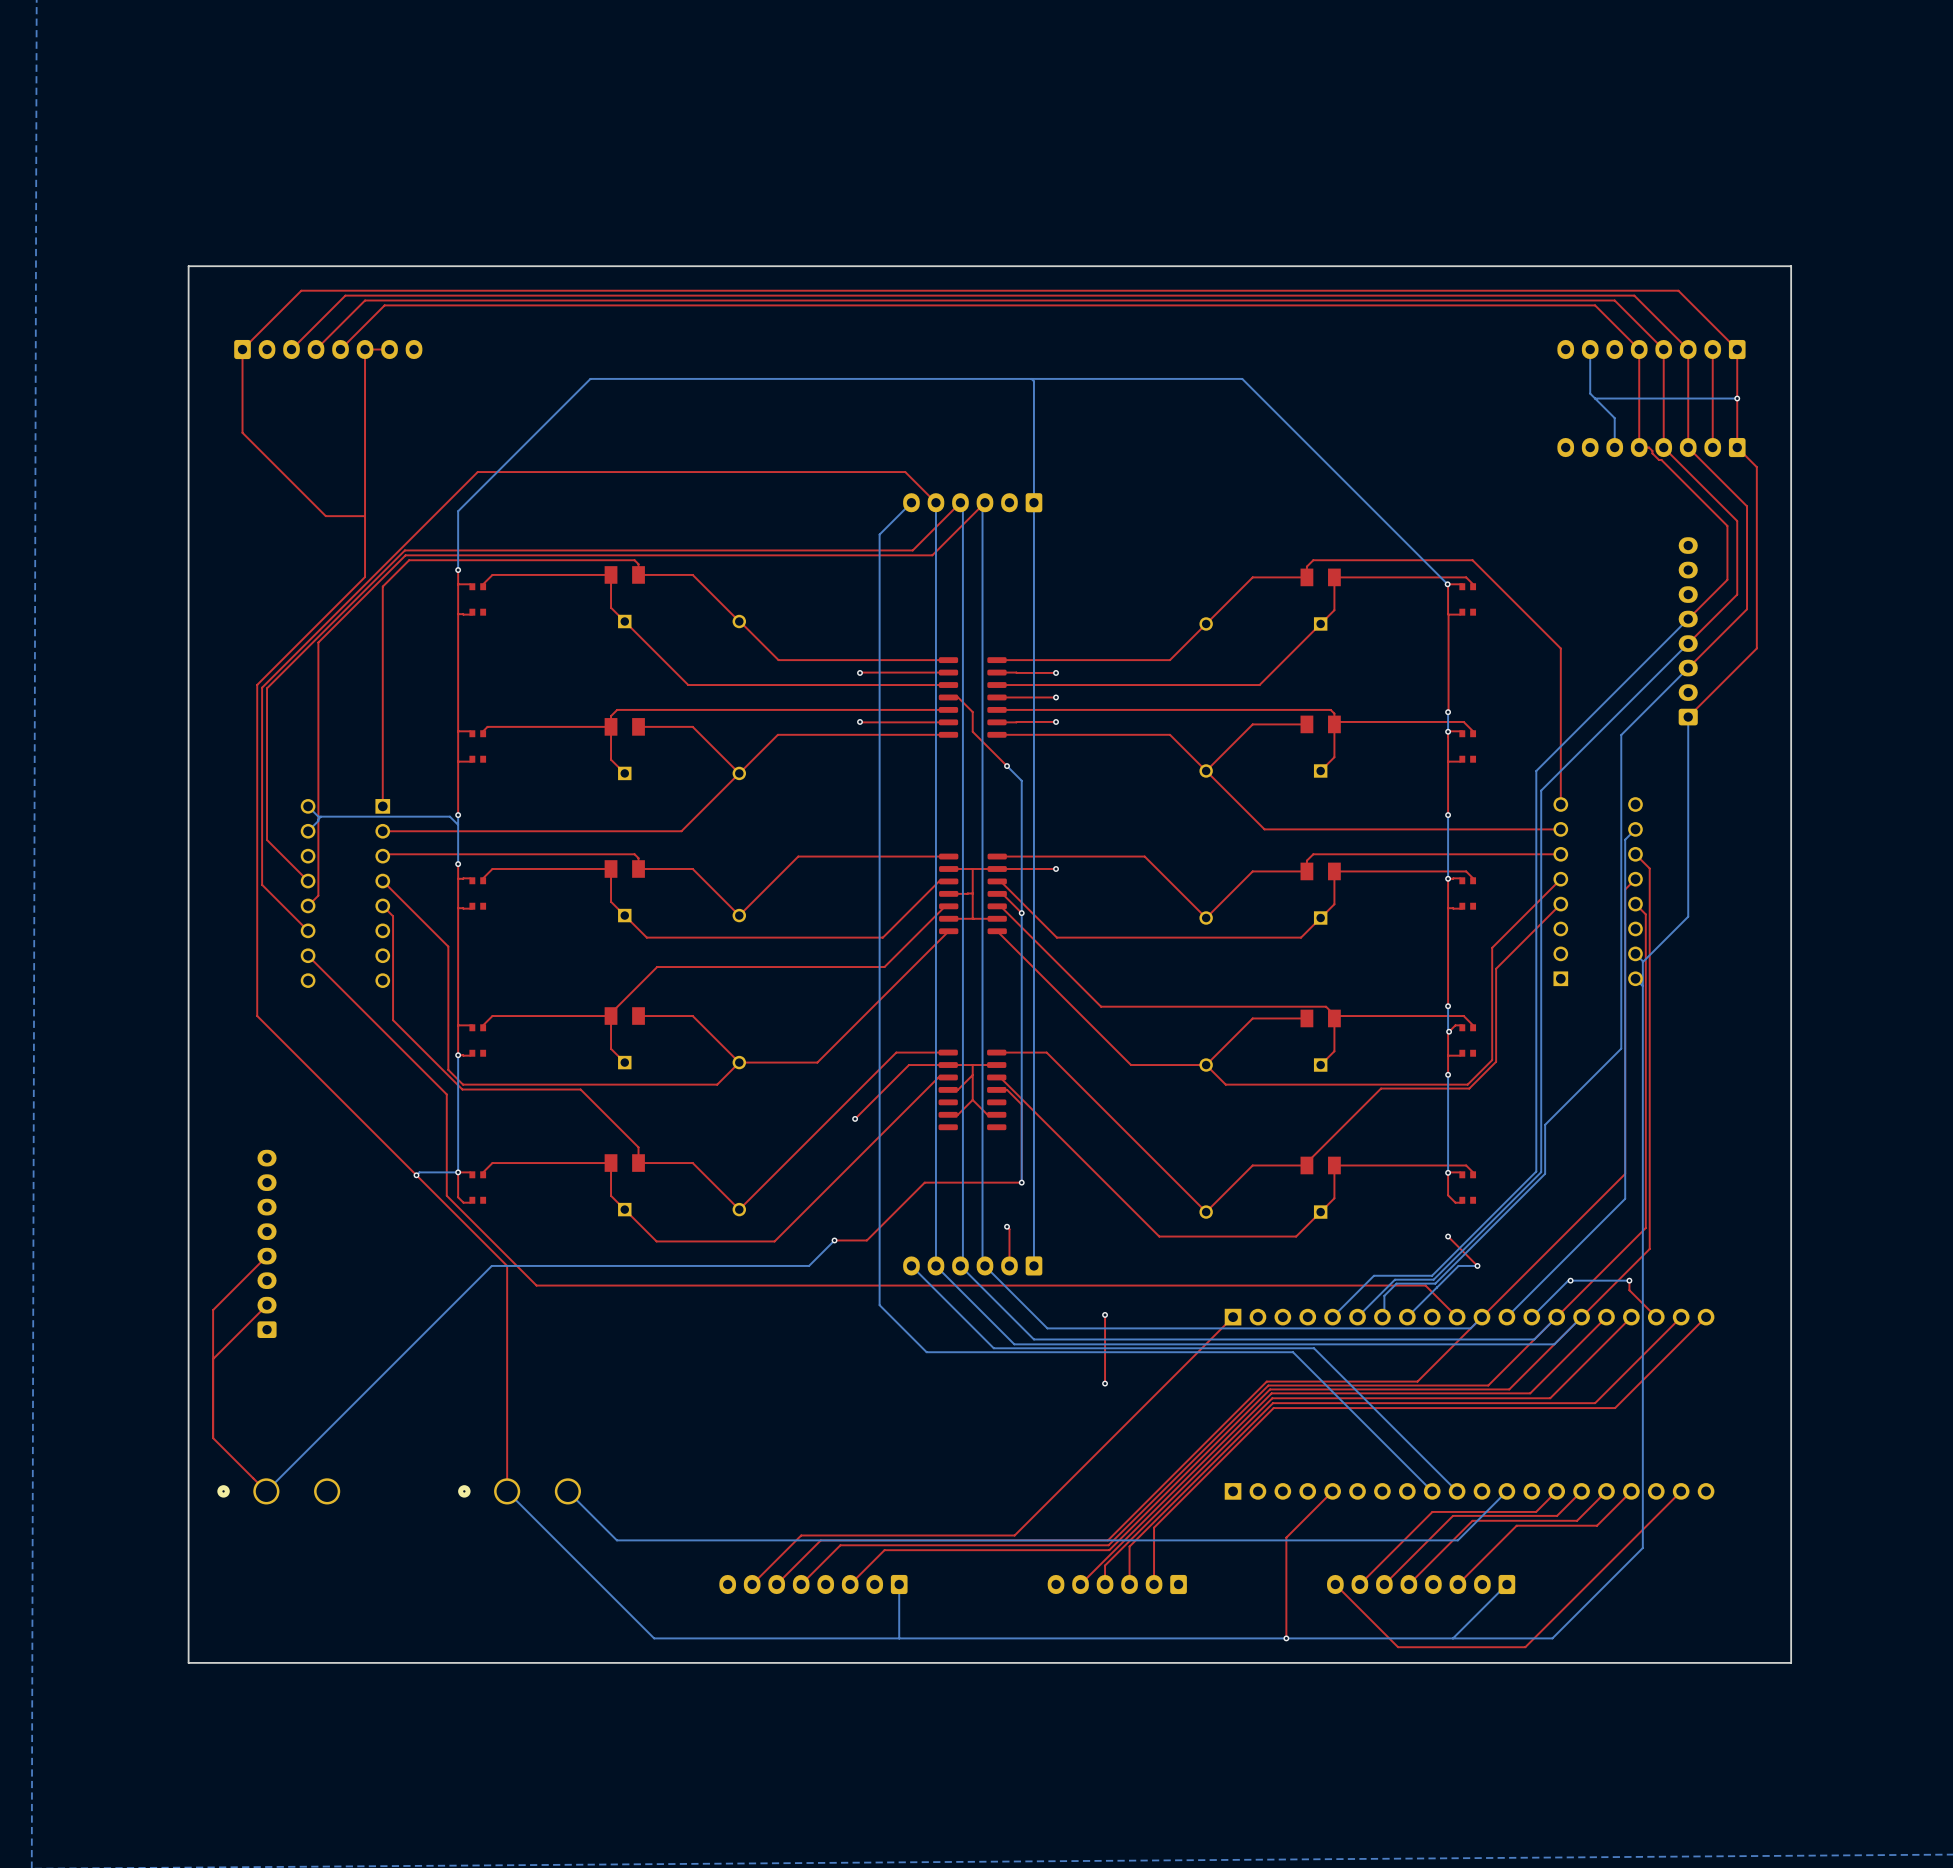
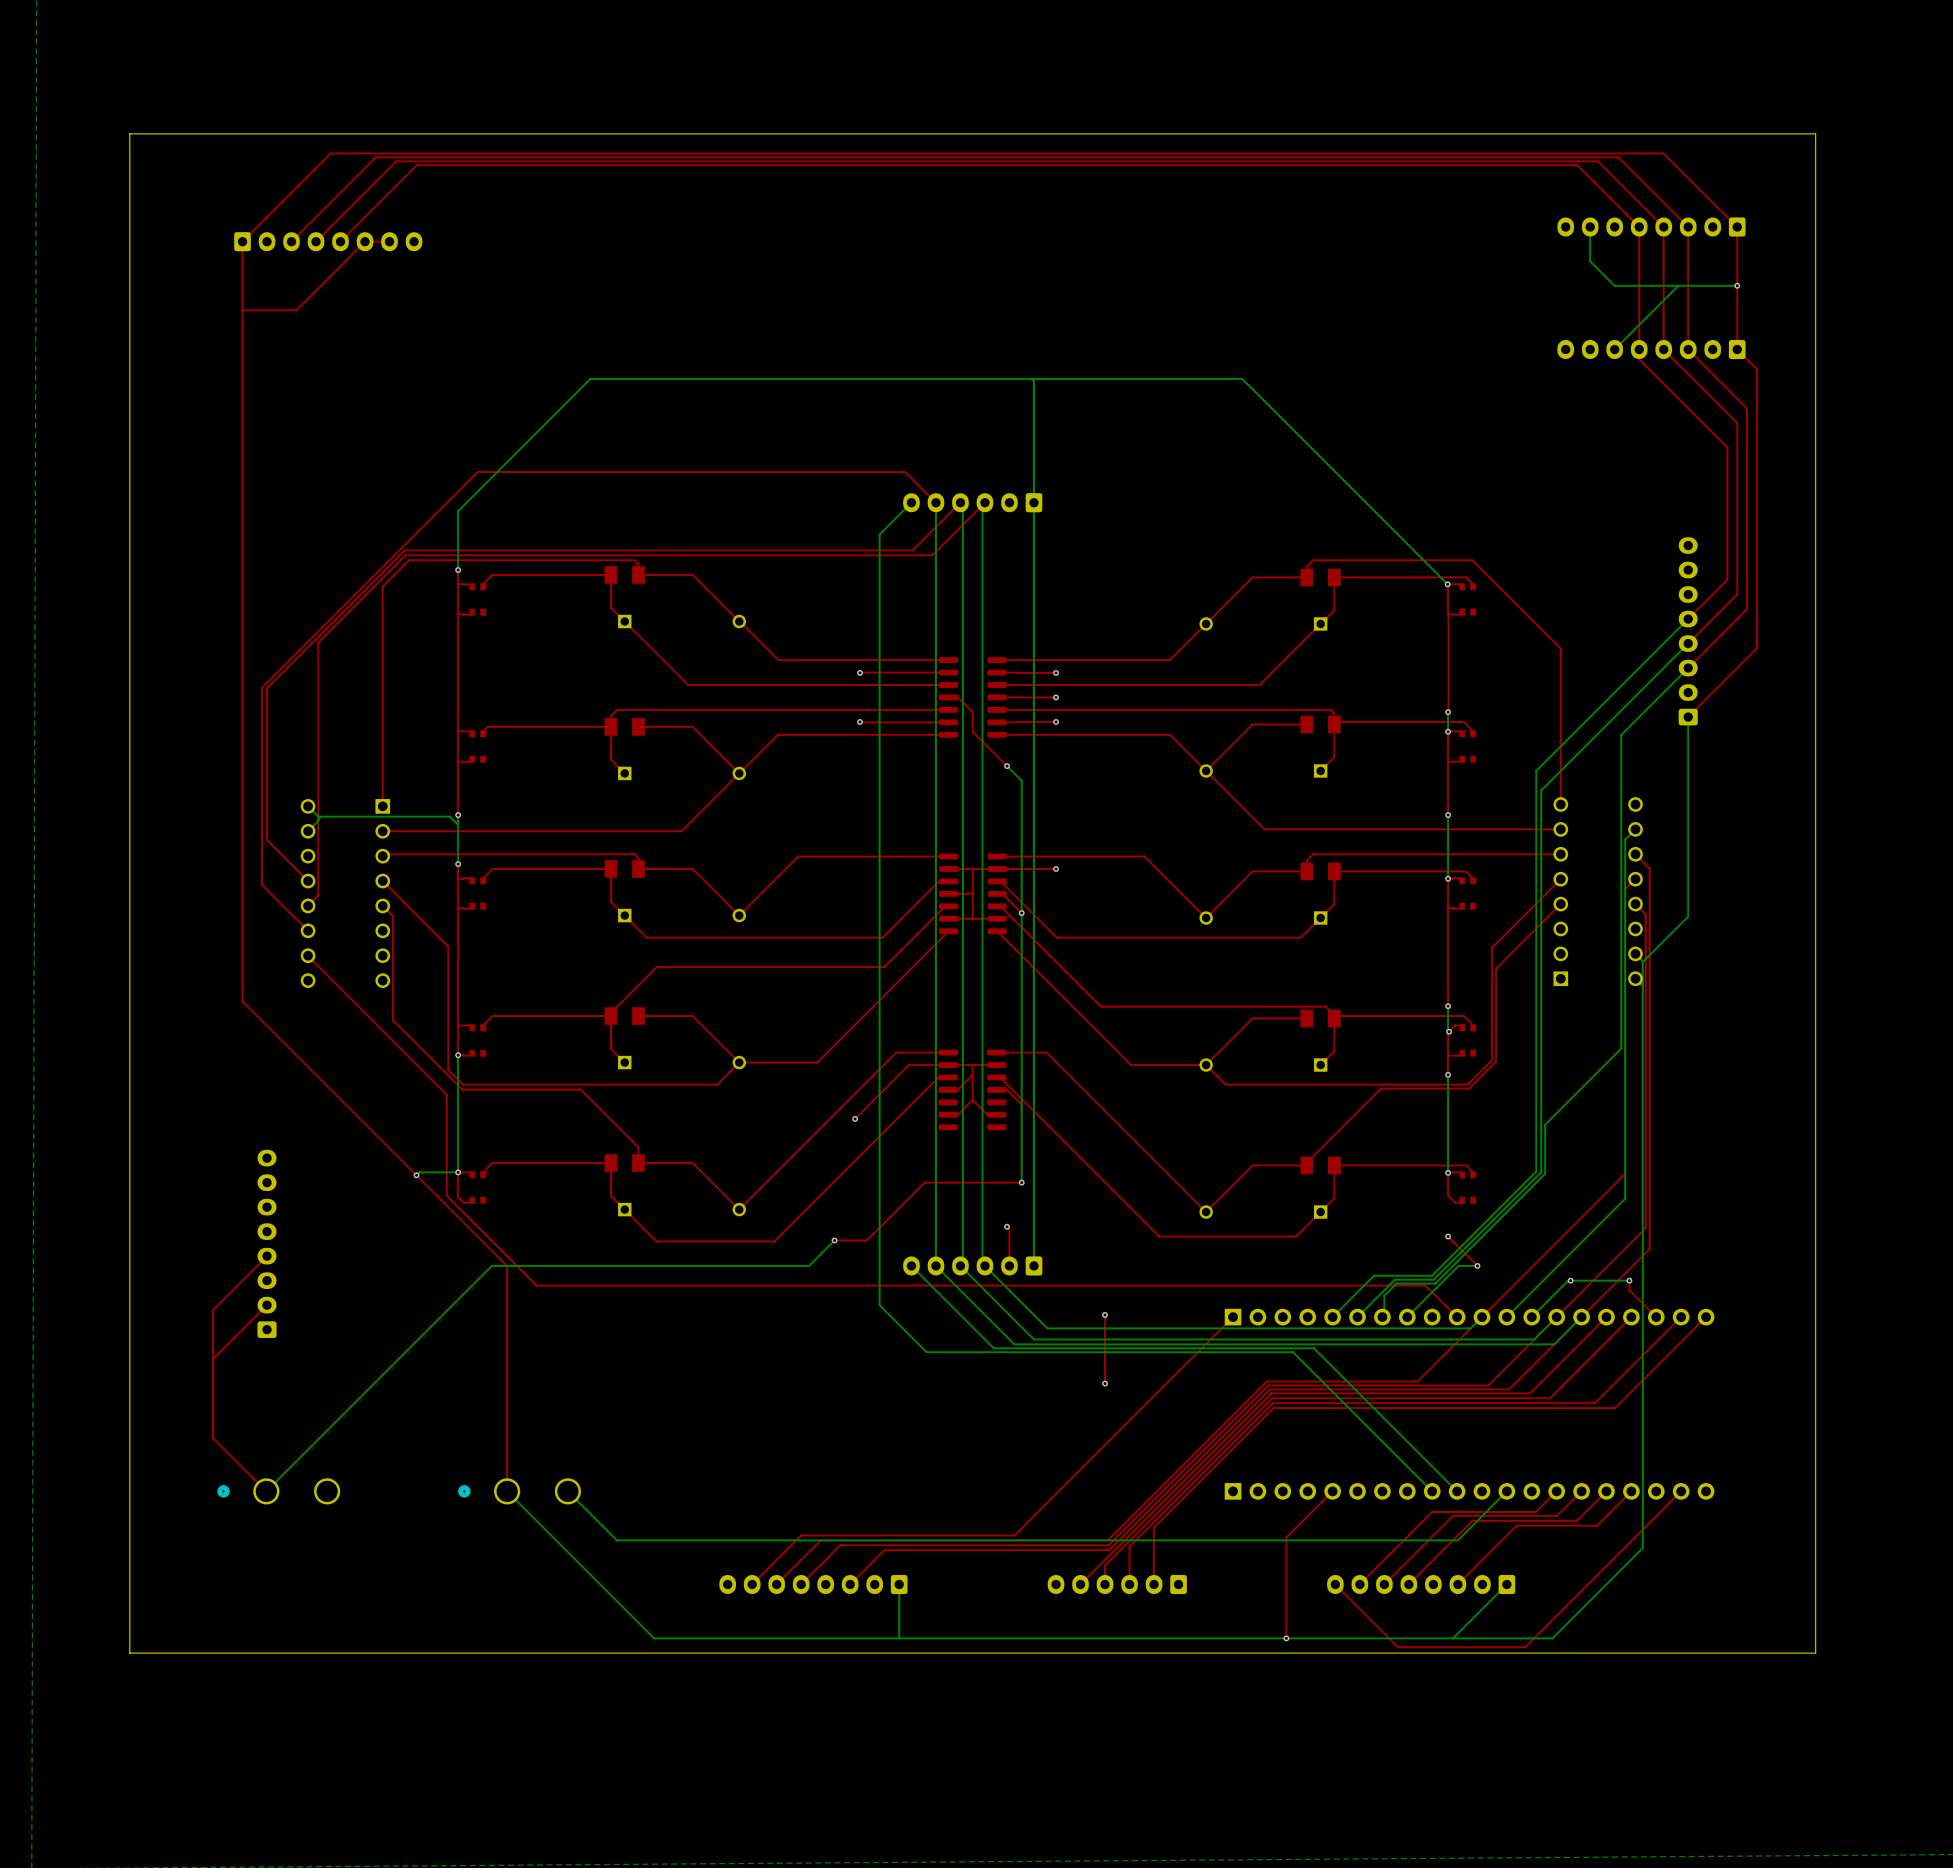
bottom track: none -> (1590, 227) (1590, 261) (1614, 285) (1737, 285)
top track: none -> (316, 241) (396, 161) (1598, 161) (1663, 227) (1663, 349) (1737, 423)
top track: none -> (389, 241) (365, 241) (296, 310) (242, 310)
board edge: (1791, 266) (188, 266) (188, 1662) (1791, 1662) (1791, 266) -> (1815, 133) (1815, 1653) (129, 1653) (129, 133) (1815, 133)
bottom track: none -> (1678, 285) (1614, 349)
via: none -> (1737, 285)
top track: (242, 349) (301, 290) (1678, 290) (1737, 349) (1737, 423) -> (242, 349) (242, 241) (330, 153) (1663, 153) (1737, 227) (1737, 349) (1756, 369) (1756, 467)
top track: (291, 349) (345, 295) (1634, 295) (1688, 349) (1688, 447) (1747, 506) -> (291, 241) (375, 157) (1618, 157) (1688, 227) (1688, 349) (1747, 408) (1747, 506)
top track: (316, 349) (365, 300) (1614, 300) (1663, 349) (1663, 447) (1737, 521) -> none
part position: (328, 349) -> (328, 241)
top track: (389, 349) (365, 349) (365, 577) (257, 684) (257, 1016) -> (242, 432) (242, 1001) (257, 1016)
bottom track: (1590, 349) (1590, 393) (1614, 418) (1614, 447) -> none
top track: (1639, 349) (1595, 305) (384, 305) (340, 349) -> (1639, 349) (1639, 227) (1577, 165) (416, 165) (340, 241)
top track: (1712, 349) (1712, 447) -> none
top track: (1639, 359) (1639, 447) (1649, 447) (1659, 460) (1661, 460) (1727, 525) -> (1639, 359) (1727, 447) (1727, 525)
bottom track: (1737, 398) (1595, 398) -> none
via: (1737, 398) -> none
top track: (242, 432) (325, 516) (365, 516) -> none
part position: (1651, 447) -> (1651, 227)
top track: (1737, 447) (1756, 467) -> (1737, 447) (1737, 521)

